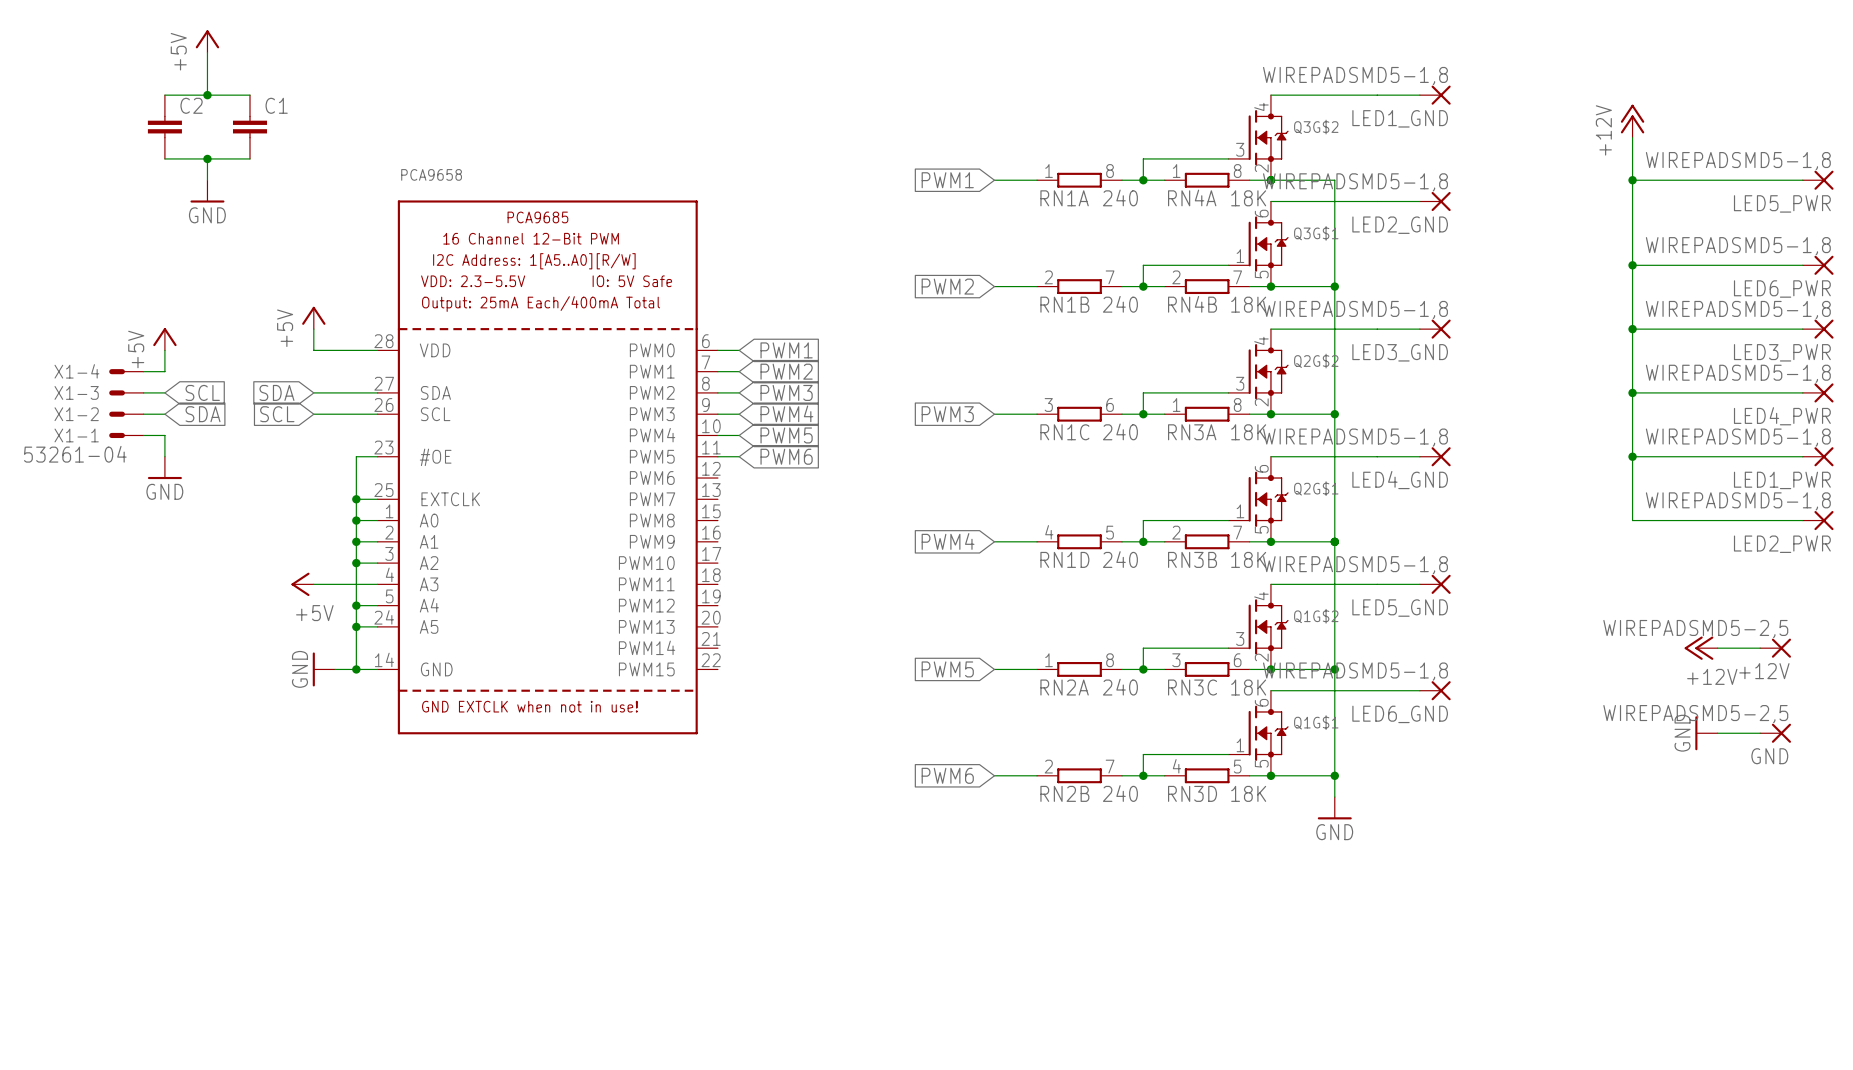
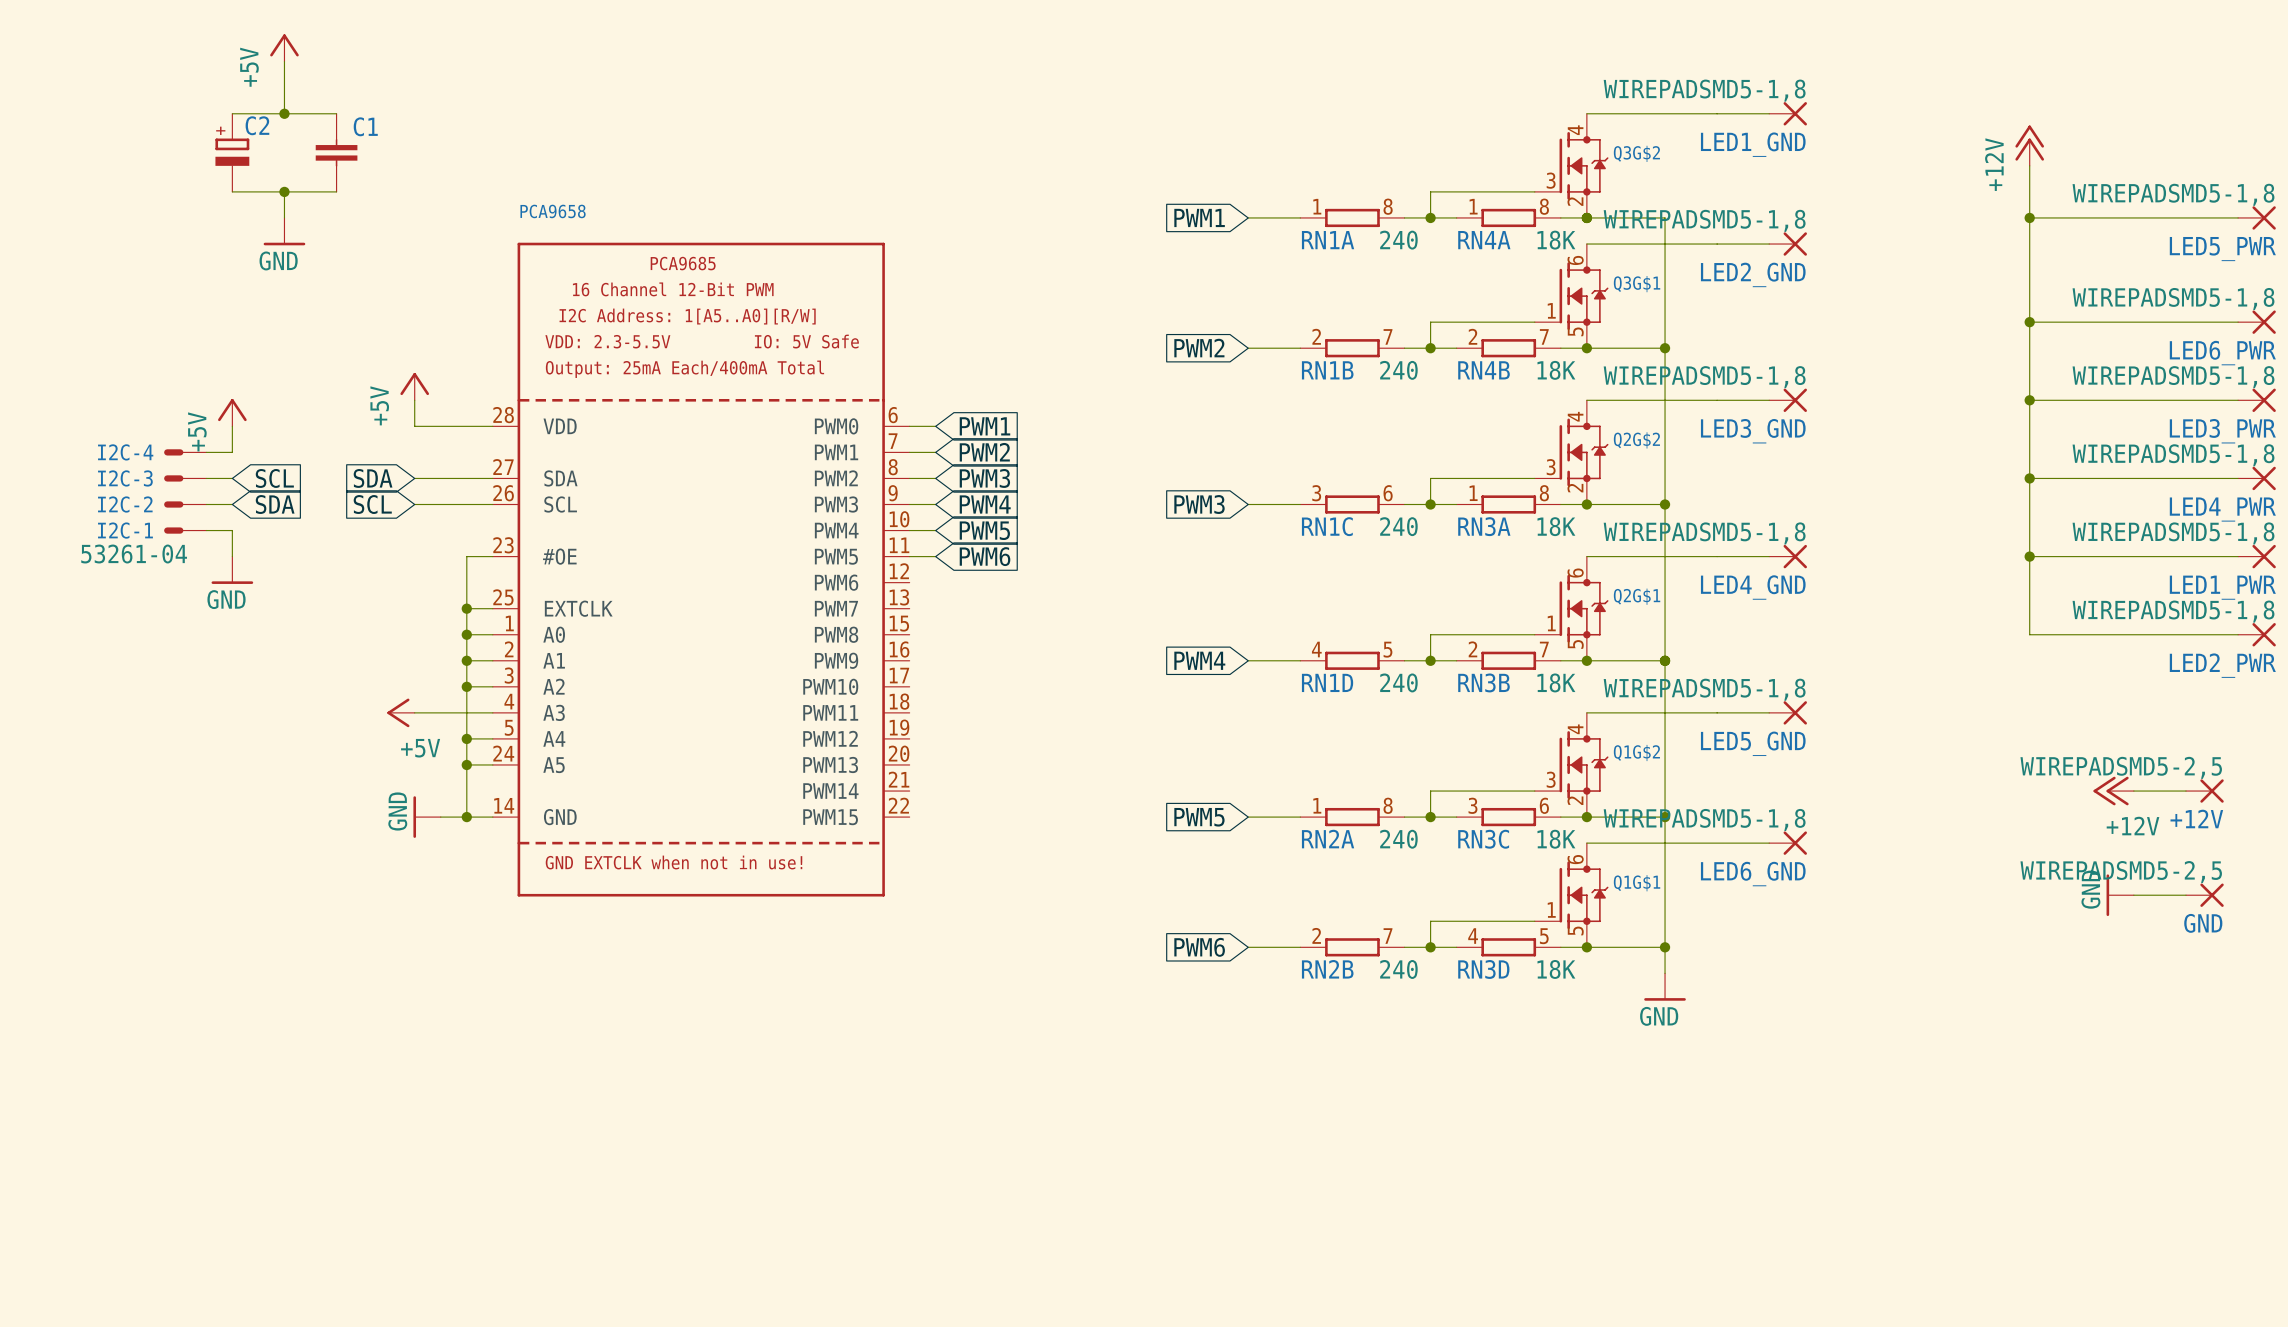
C2 symbol: [147, 95, 182, 159] -> [215, 113, 250, 192]
X1-4 name: X1-4 (76, 371) -> I2C-4 (125, 452)
X1-3 name: X1-3 (76, 392) -> I2C-3 (125, 478)
X1-2 name: X1-2 (76, 414) -> I2C-2 (125, 504)
X1-1 name: X1-1 (76, 435) -> I2C-1 (125, 530)

